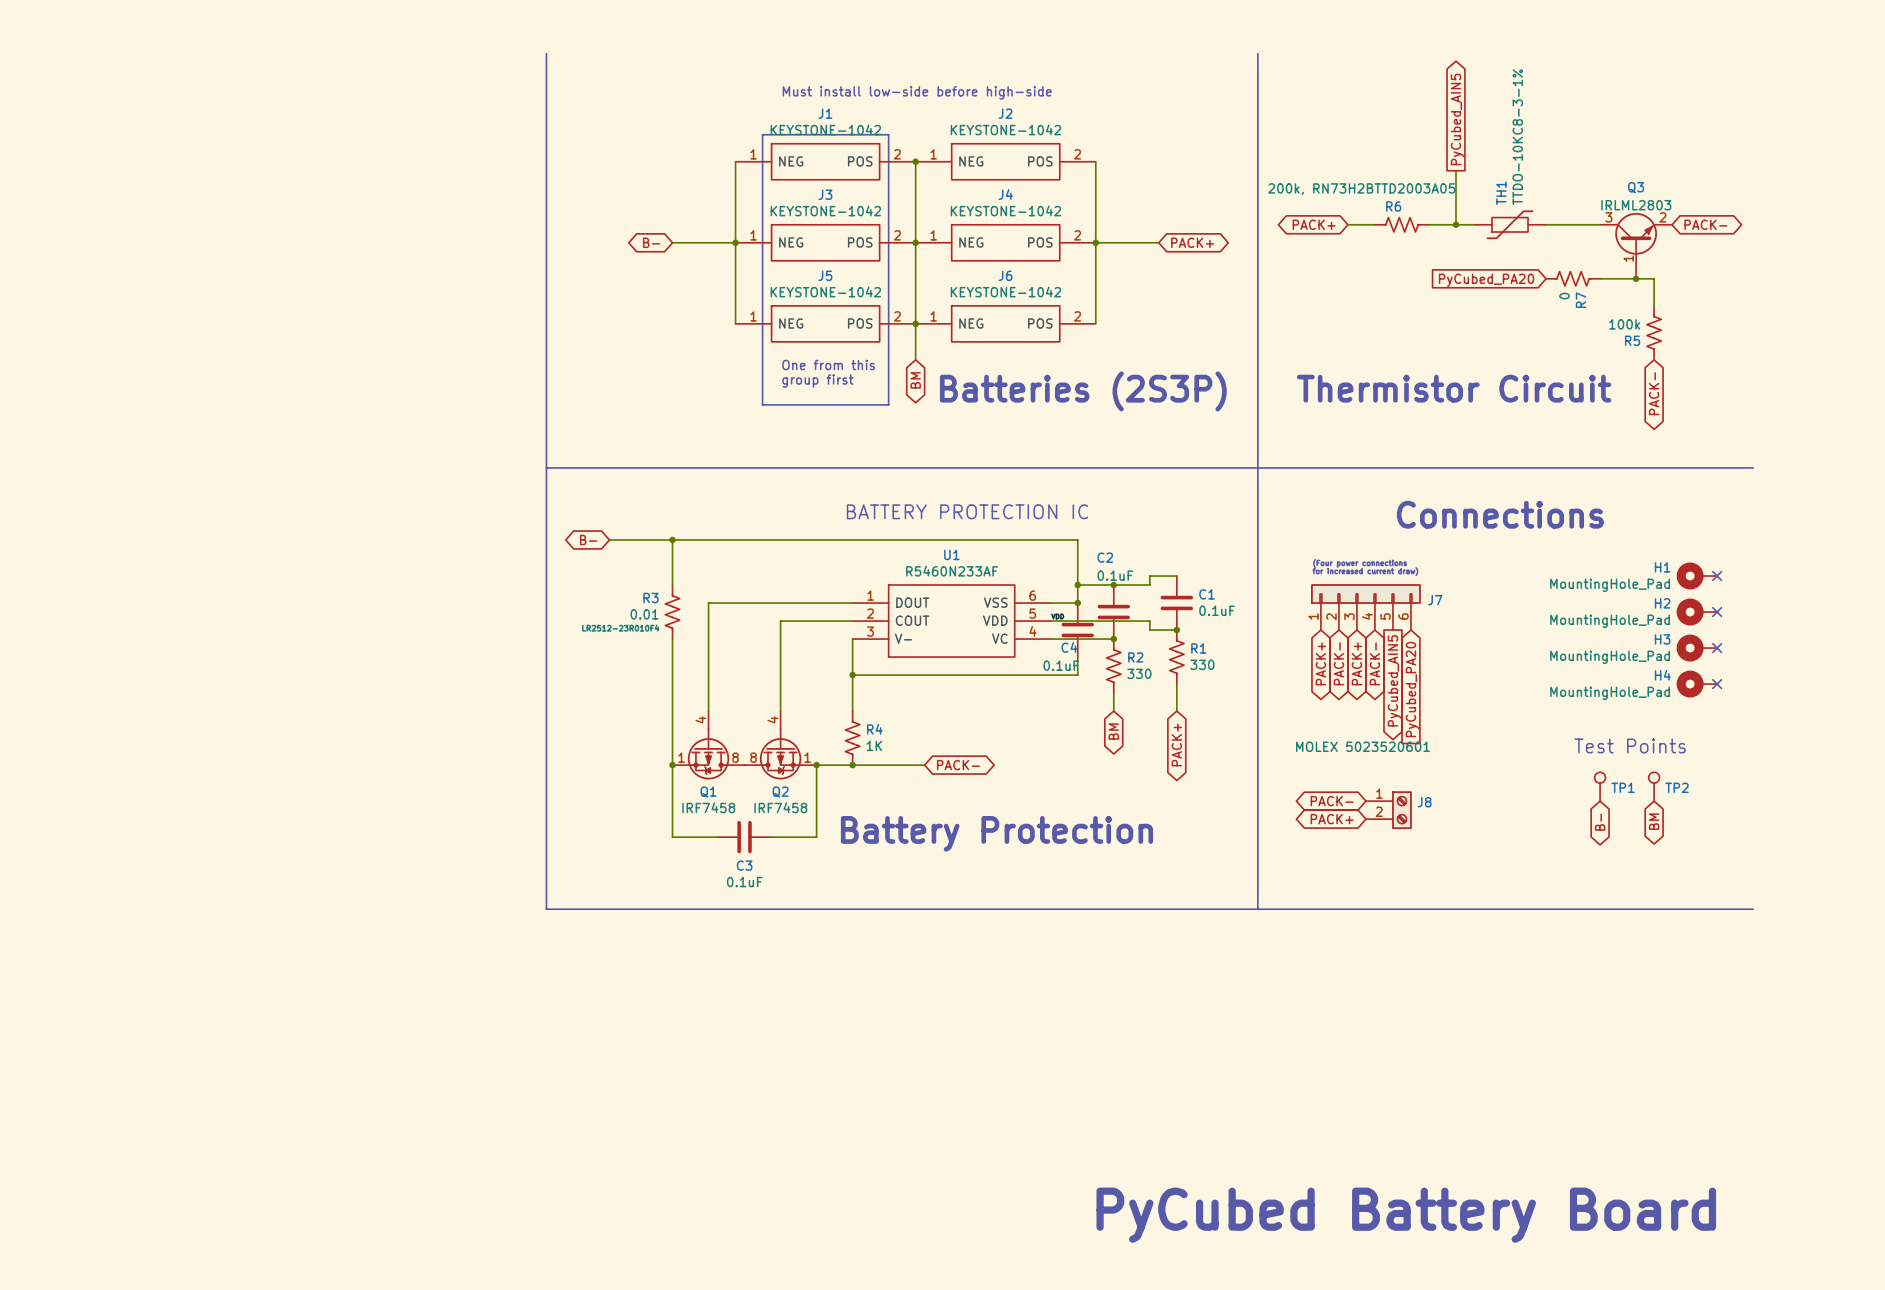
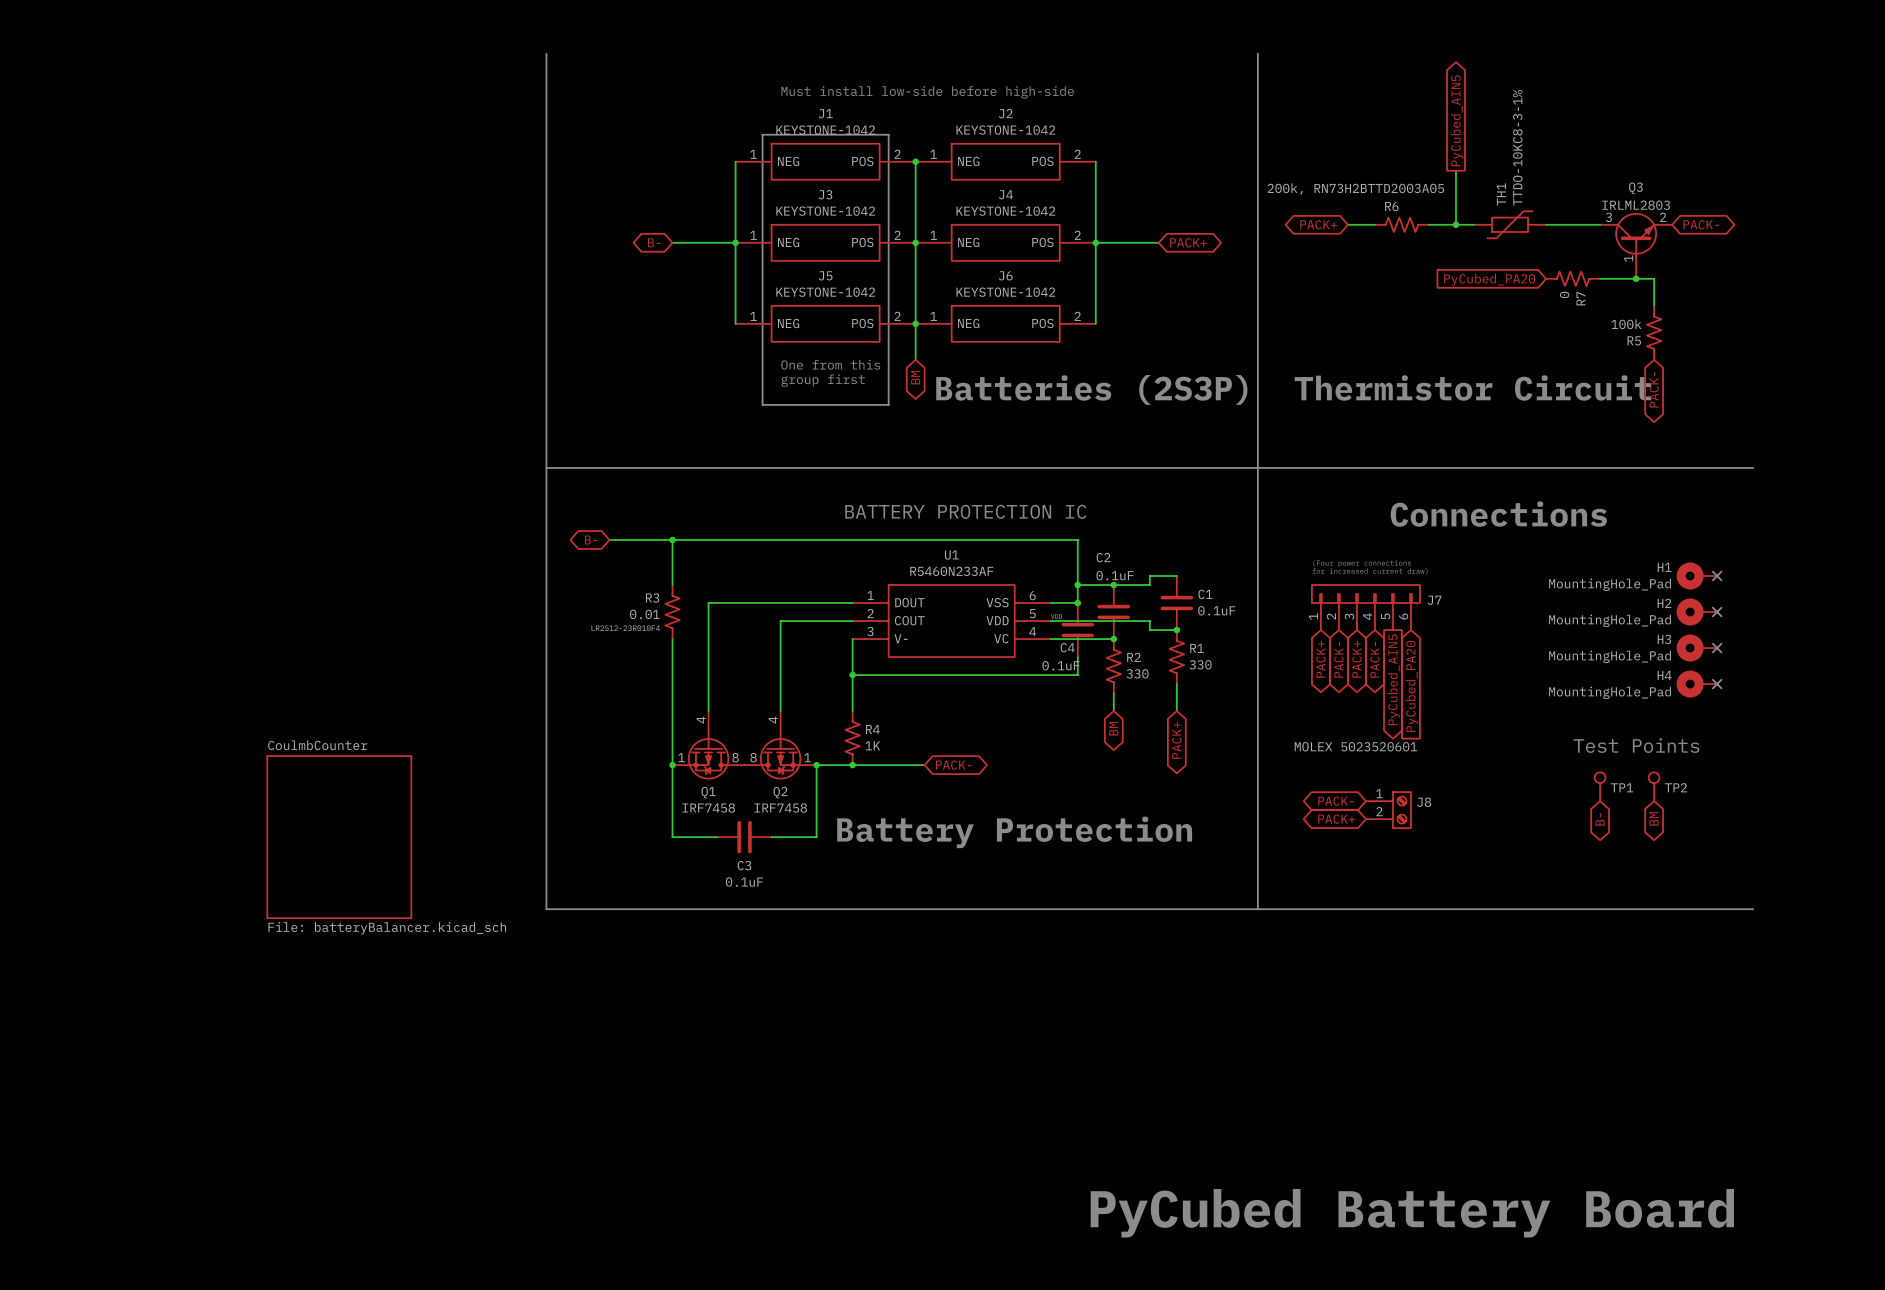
sheet CoulmbCounter: none -> File: batteryBalancer.kicad_sch (339, 837)

